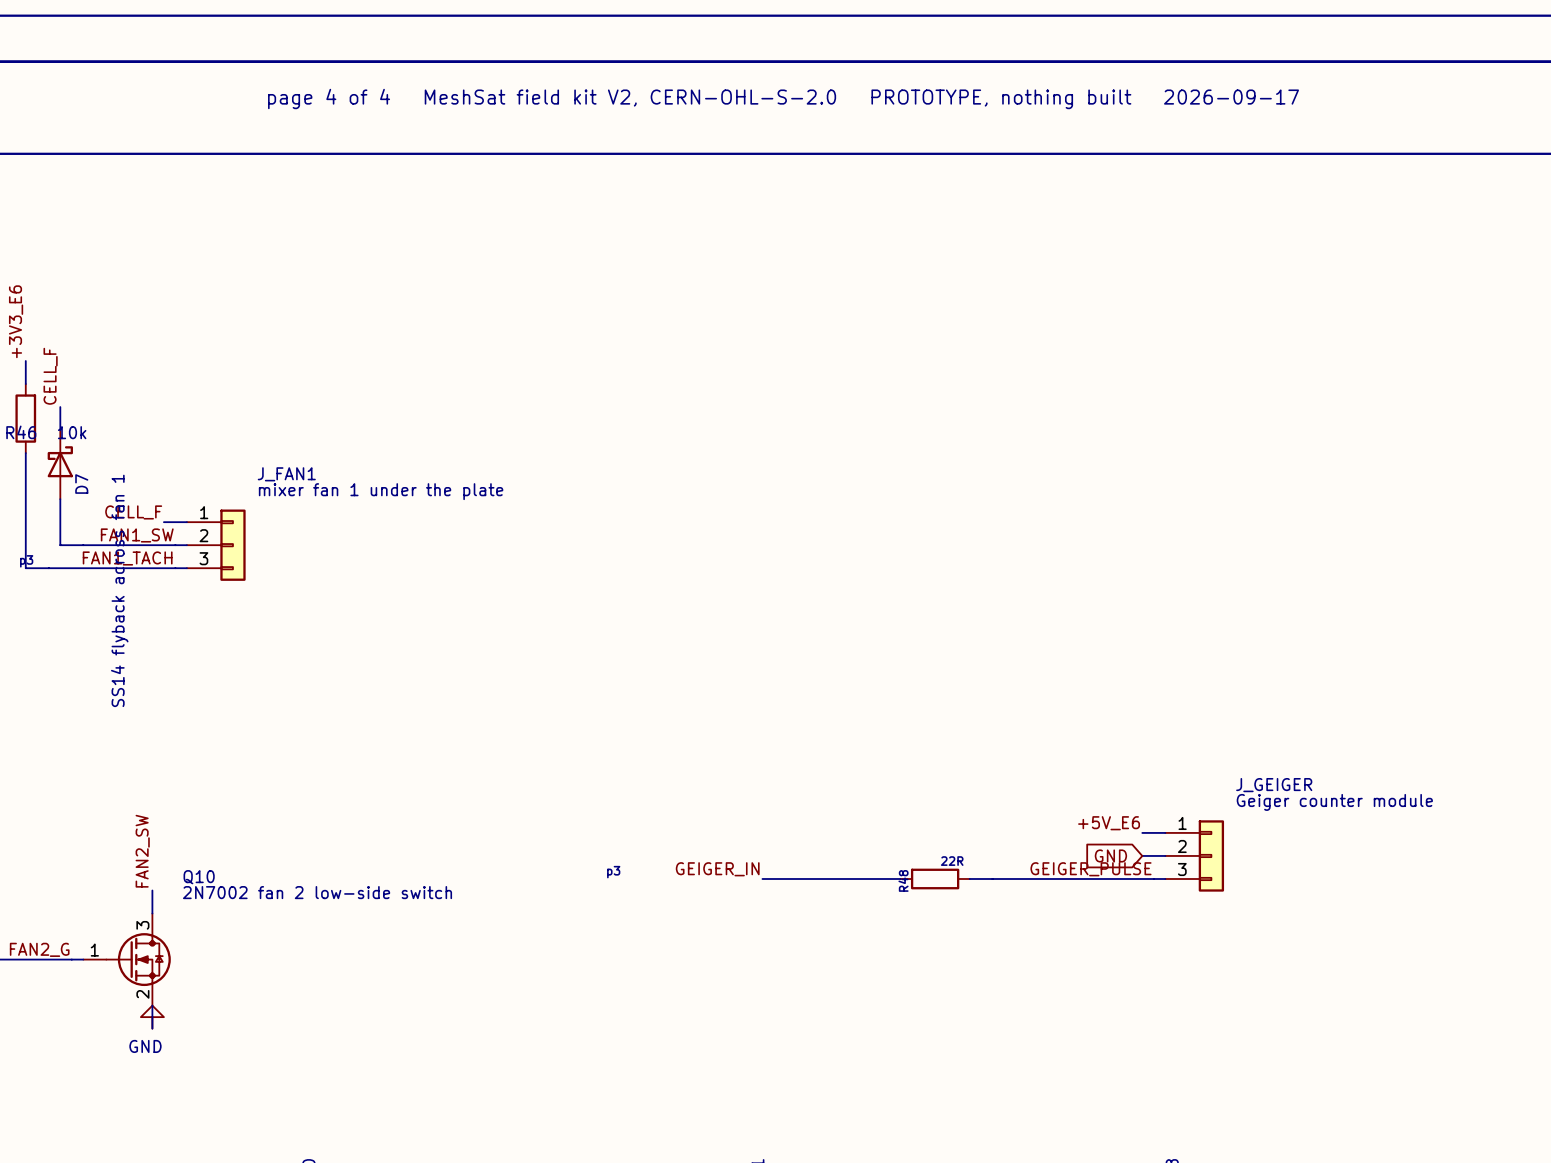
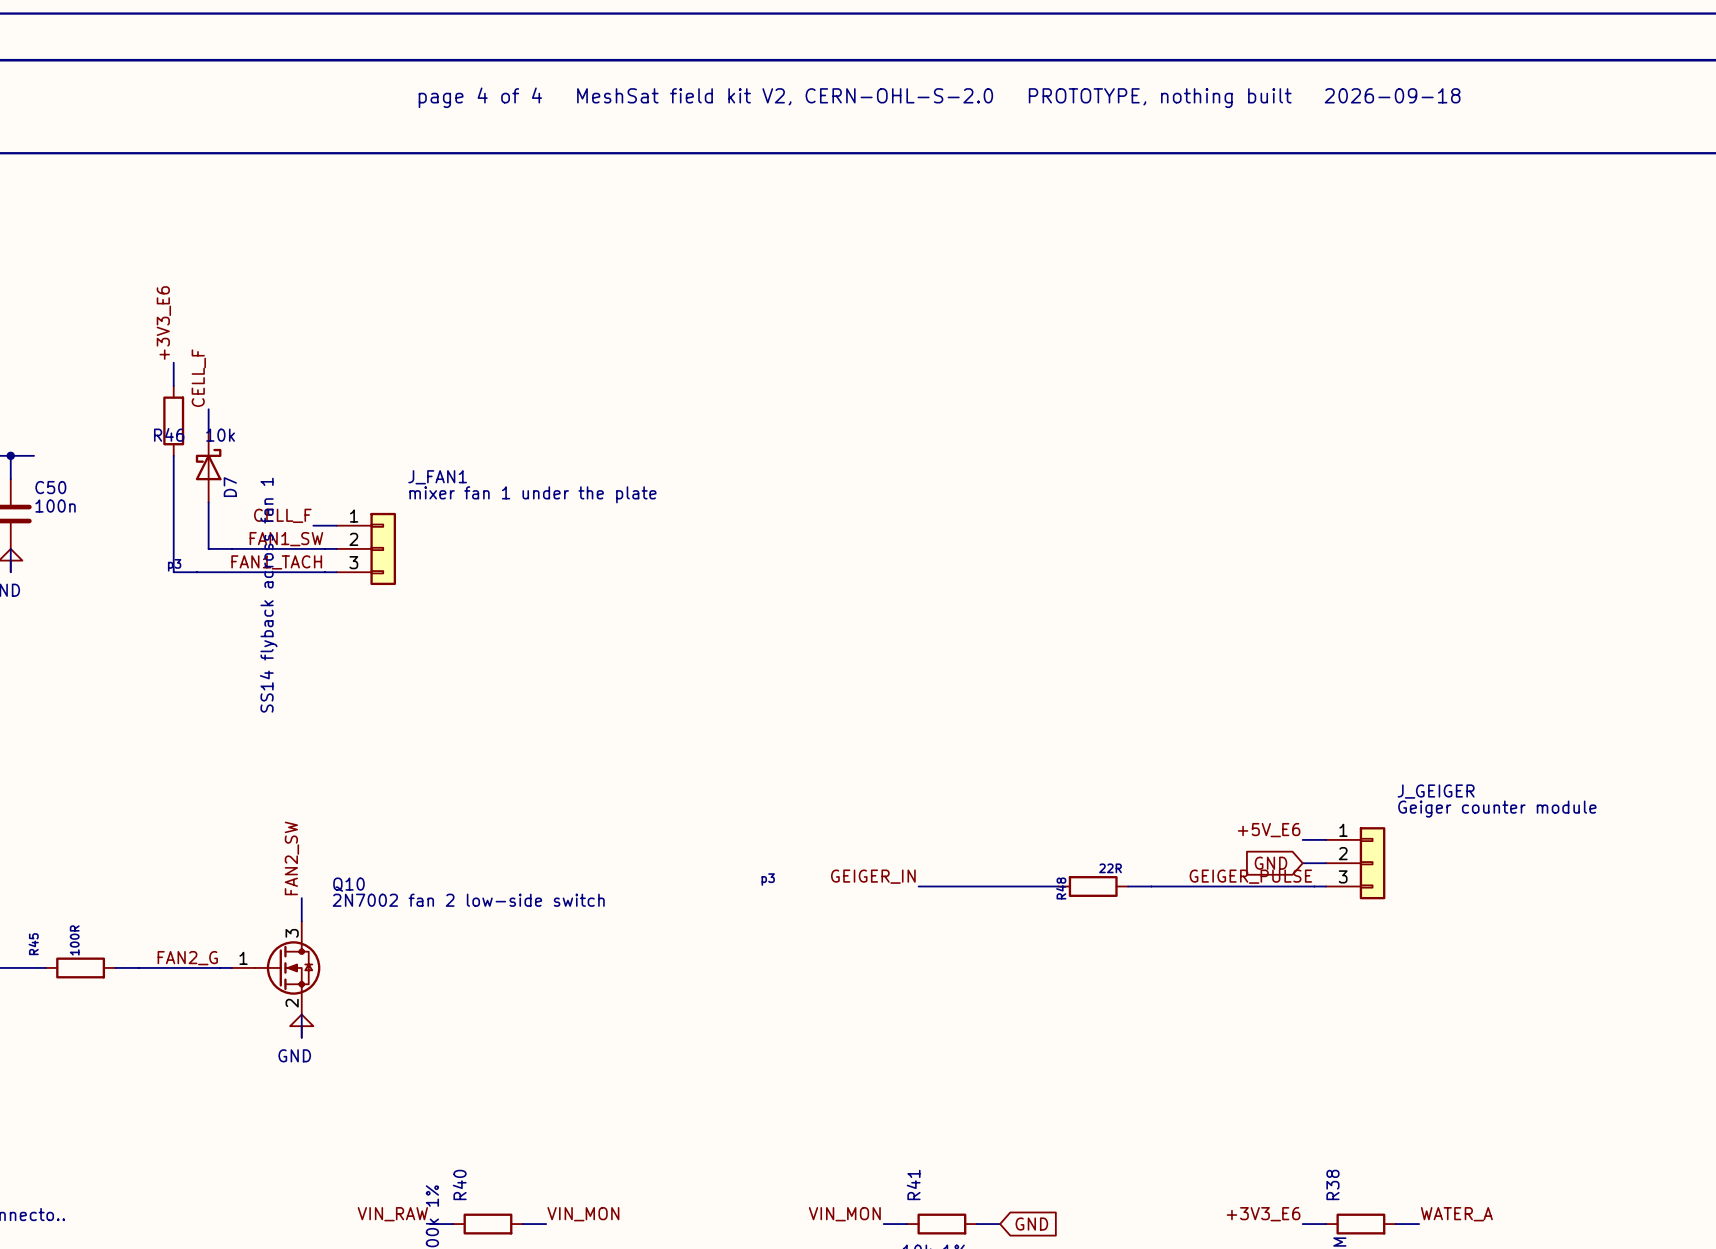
text: page 4 of 4 MeshSat field kit V2, CERN-OHL-S-2.0 PROTOTYPE, nothing built 2026-09-17 (783, 98) -> page 4 of 4 MeshSat field kit V2, CERN-OHL-S-2.0 PROTOTYPE, nothing built 2026-09-18 (939, 97)

